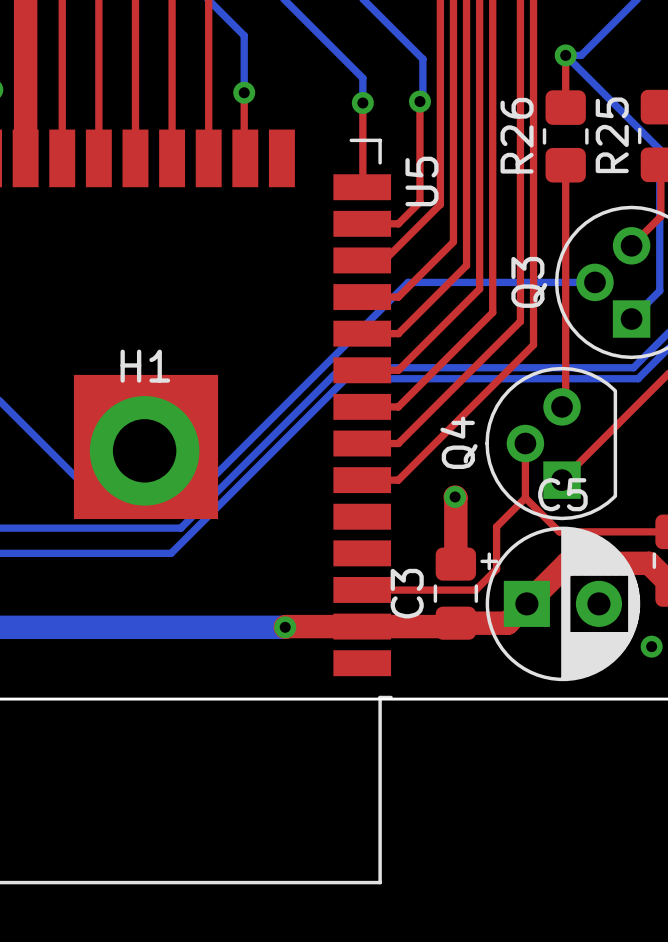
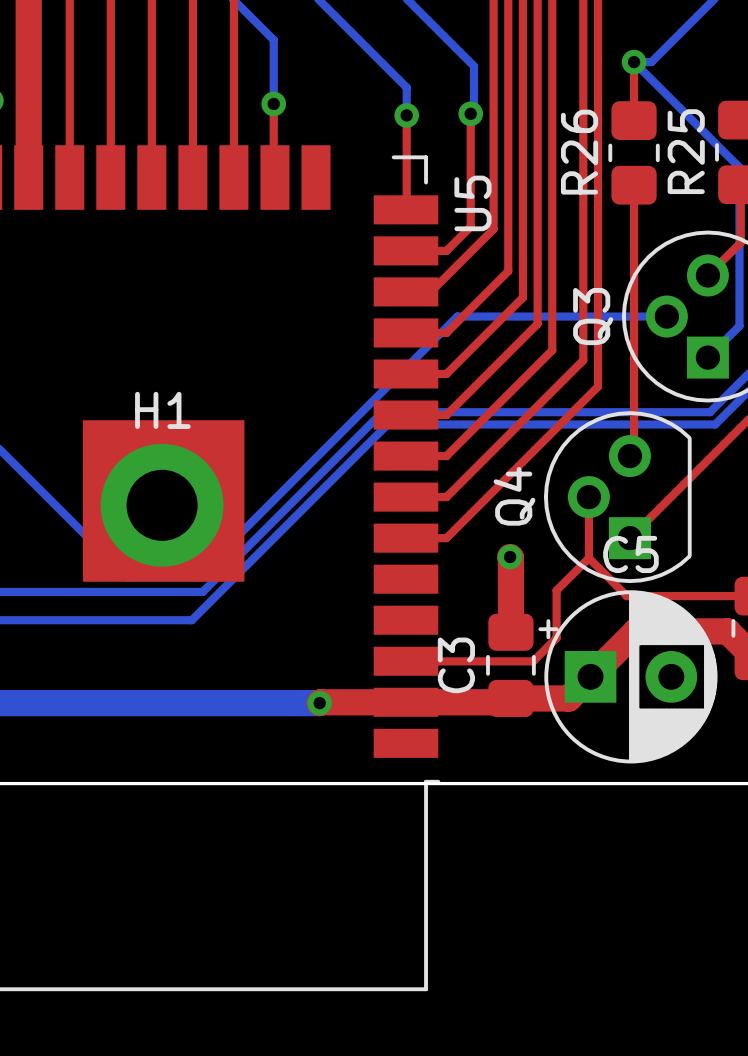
via: (651, 646) -> none

